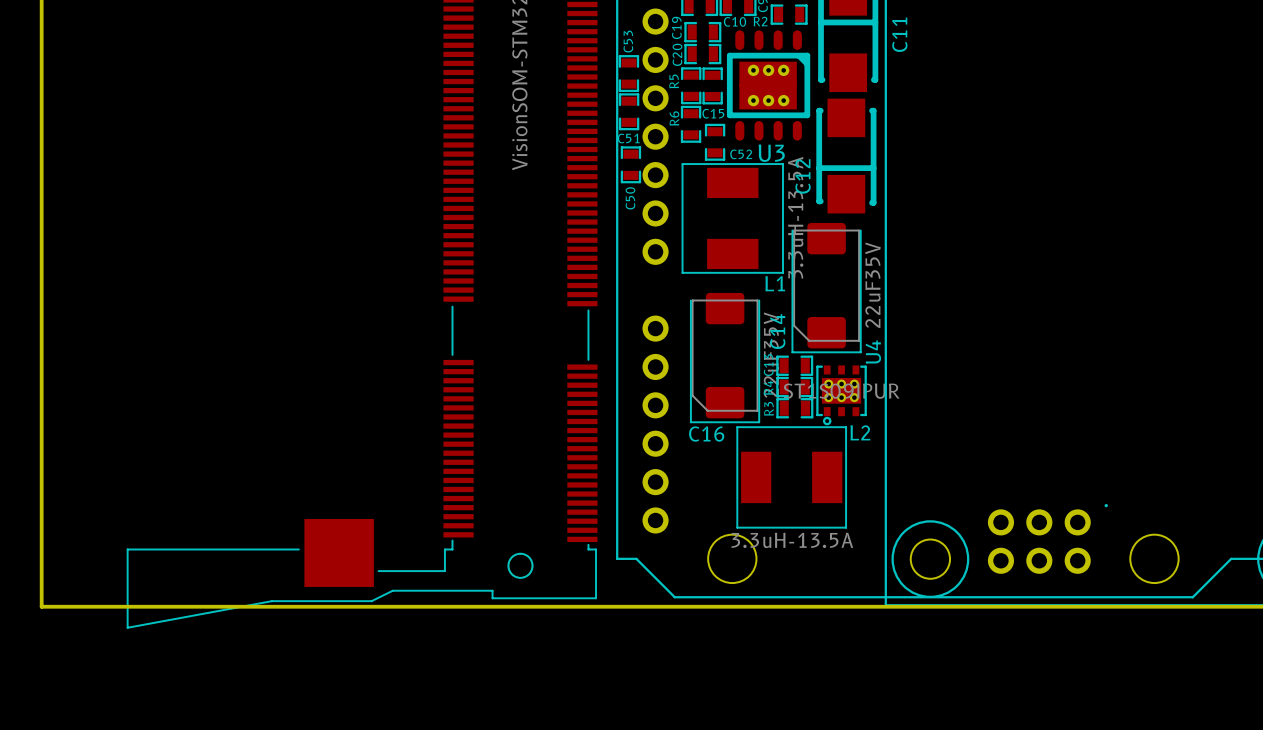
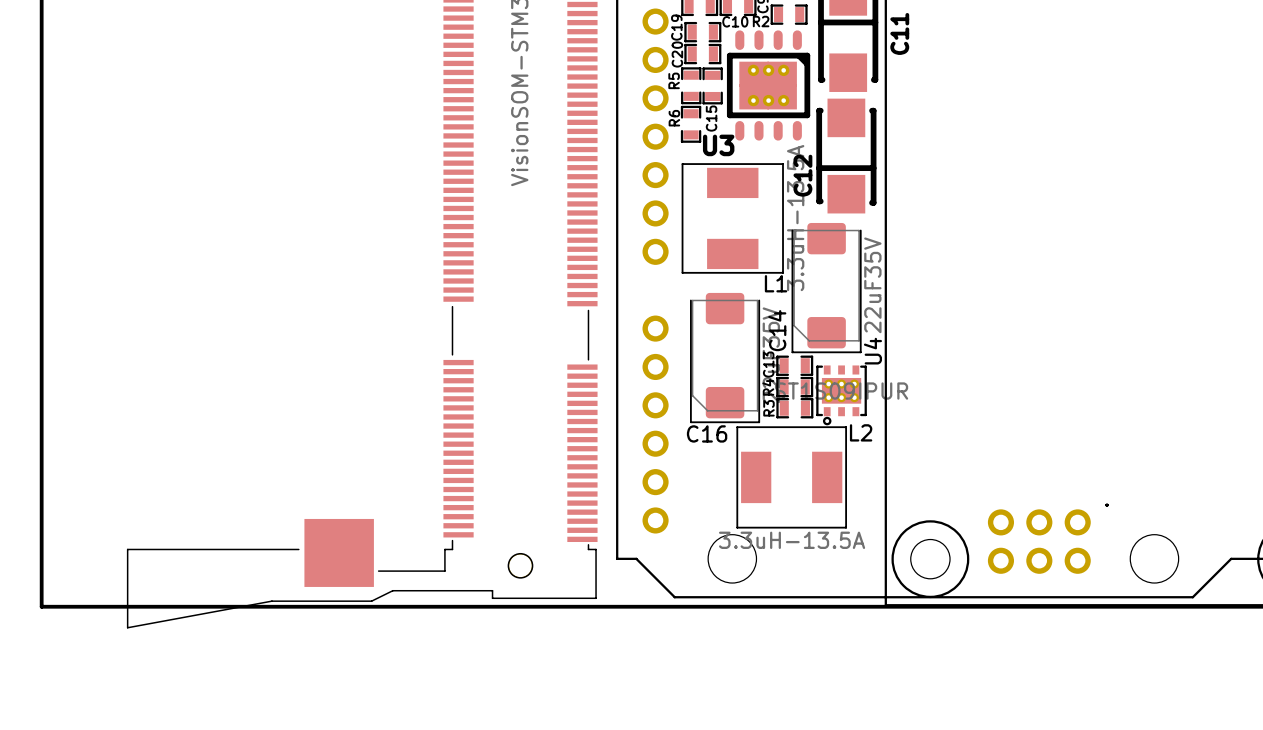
C53: (628, 73) -> none
C51: (629, 111) -> none
C15 name rotation: 0° (713, 113) -> 90° counterclockwise (711, 118)
C52: (715, 142) -> none
U3 name position: U3 (771, 153) -> U3 (718, 145)
C50: (630, 164) -> none

